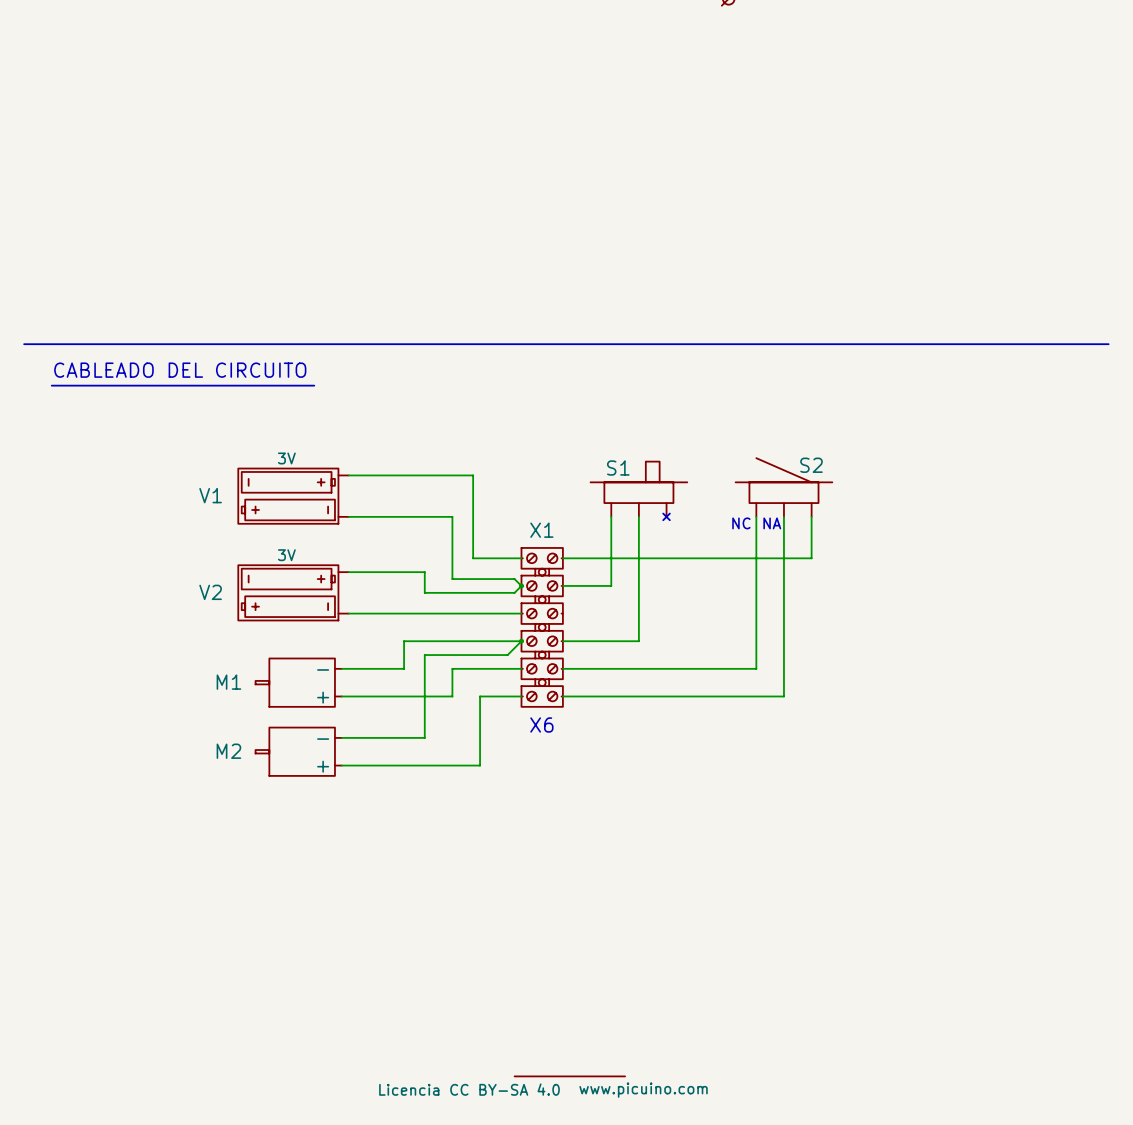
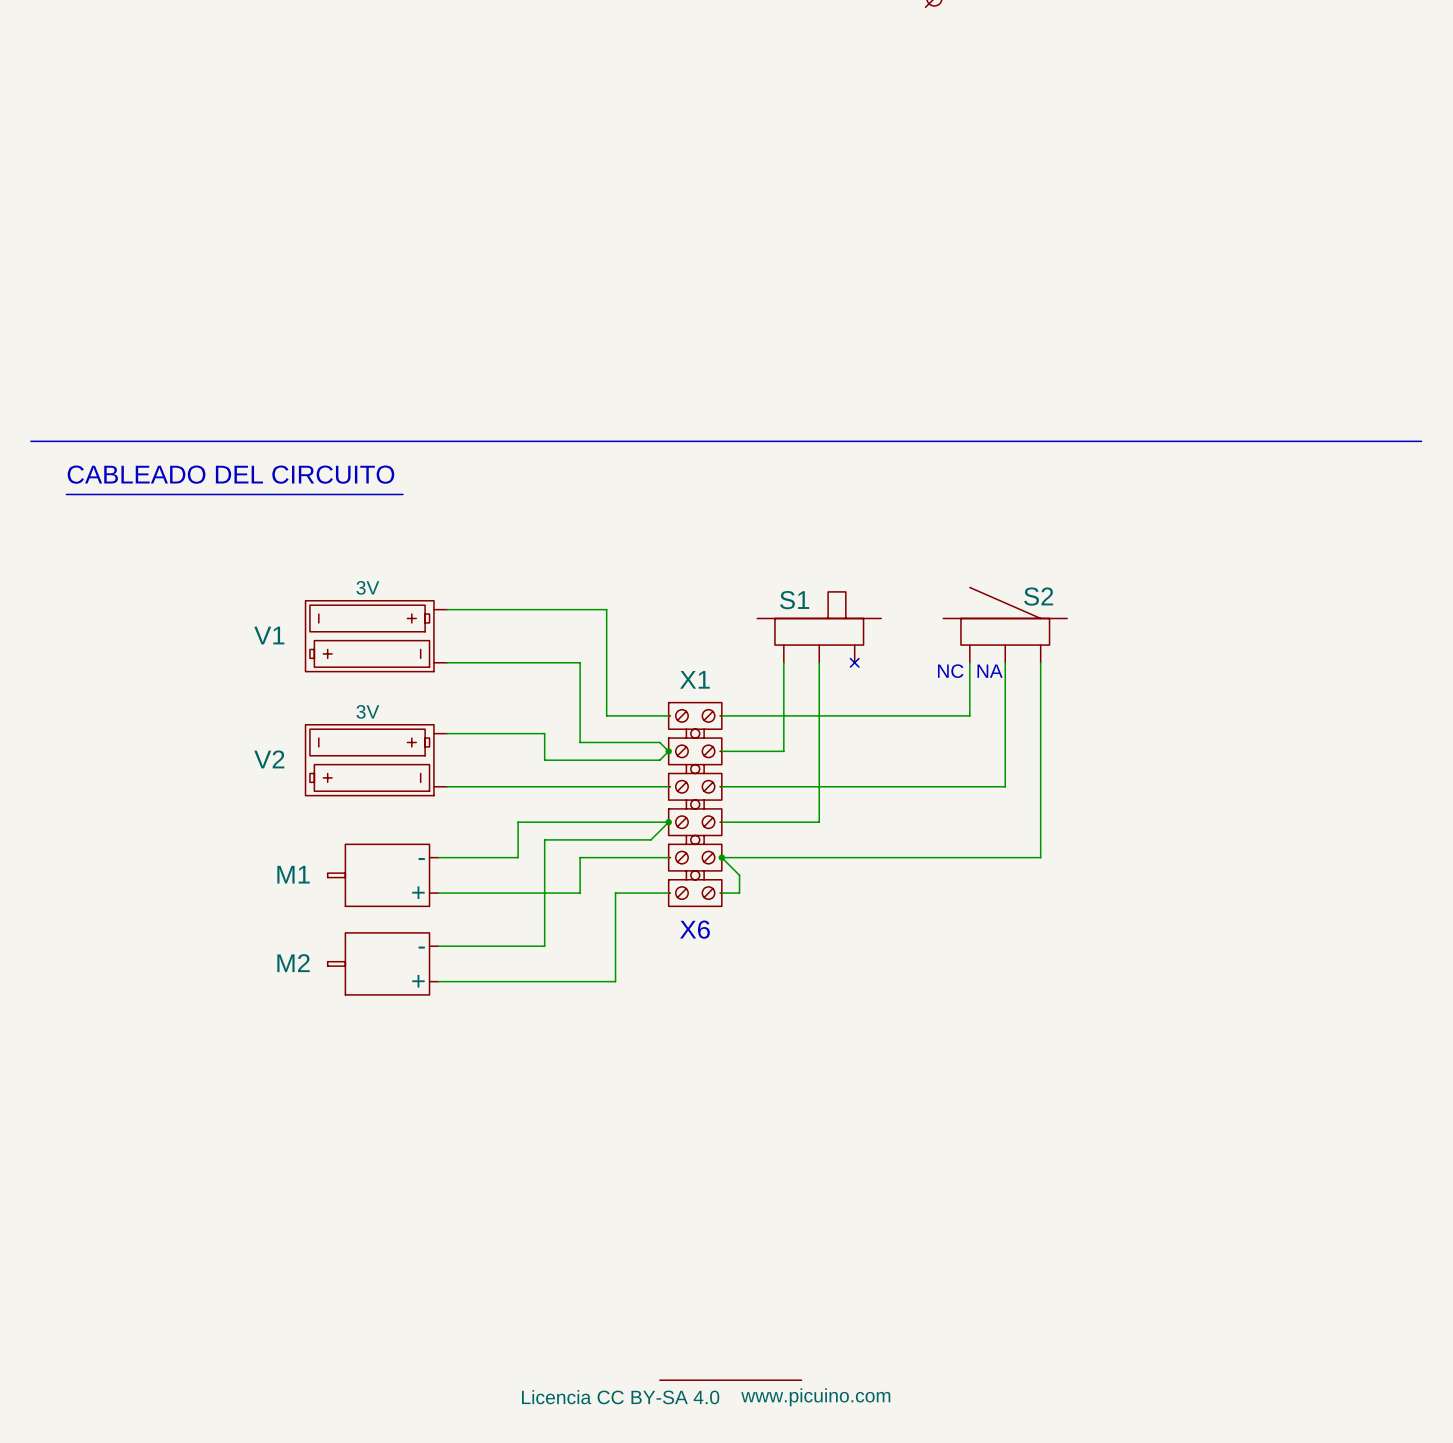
wire: (811, 558) (756, 558) (756, 668) -> (1040, 715) (1040, 857) (969, 857)
wire: (783, 613) (783, 696) (576, 696) -> (1005, 786) (721, 786)
wire: none -> (721, 857) (739, 875) (739, 893)
junction: none -> (721, 857)

